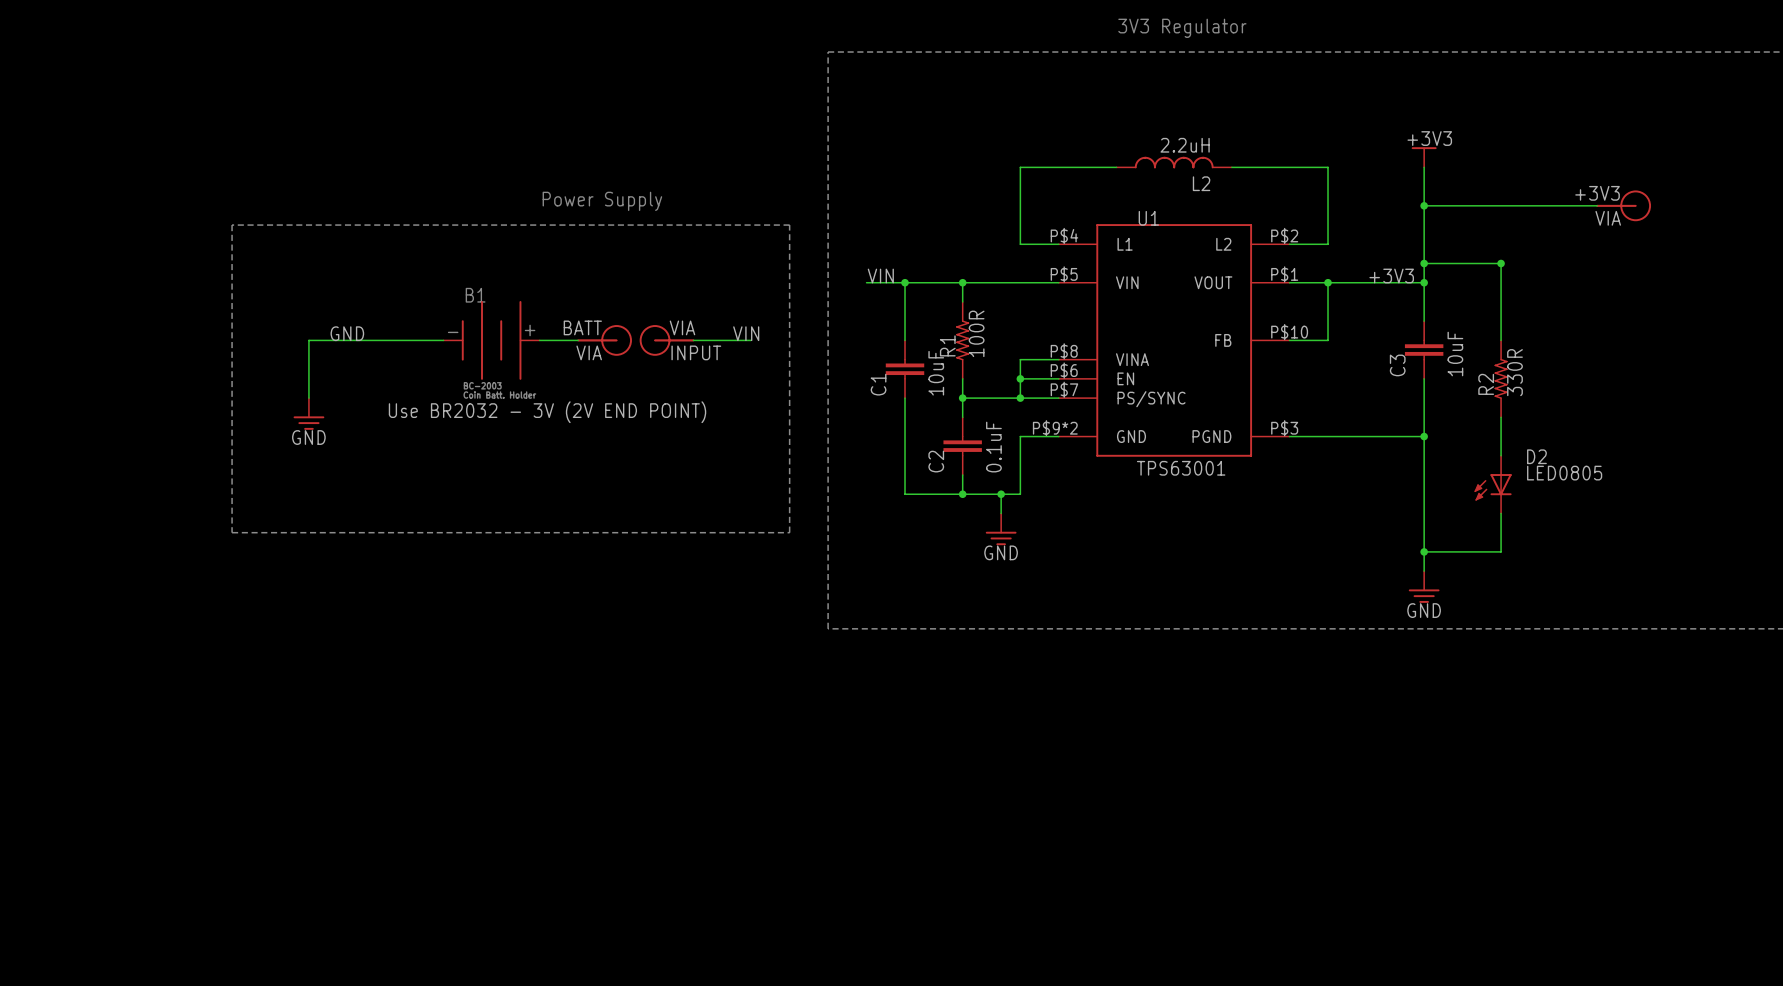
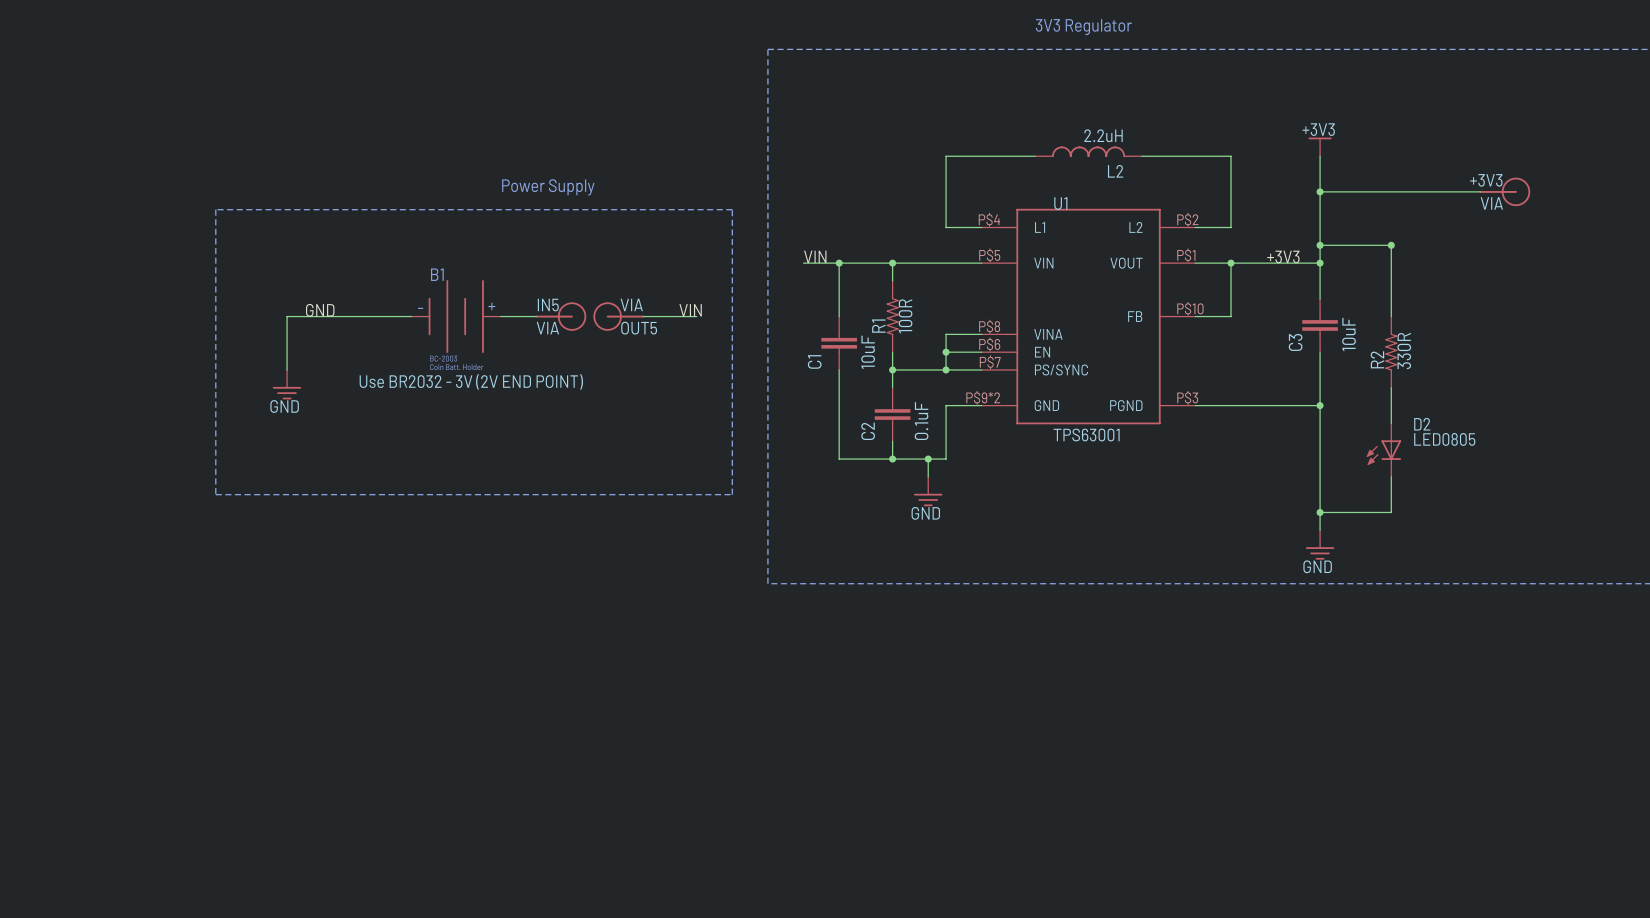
part value: BATT (582, 327) -> IN5 (548, 305)
part value: INPUT (696, 352) -> OUT5 (639, 328)

